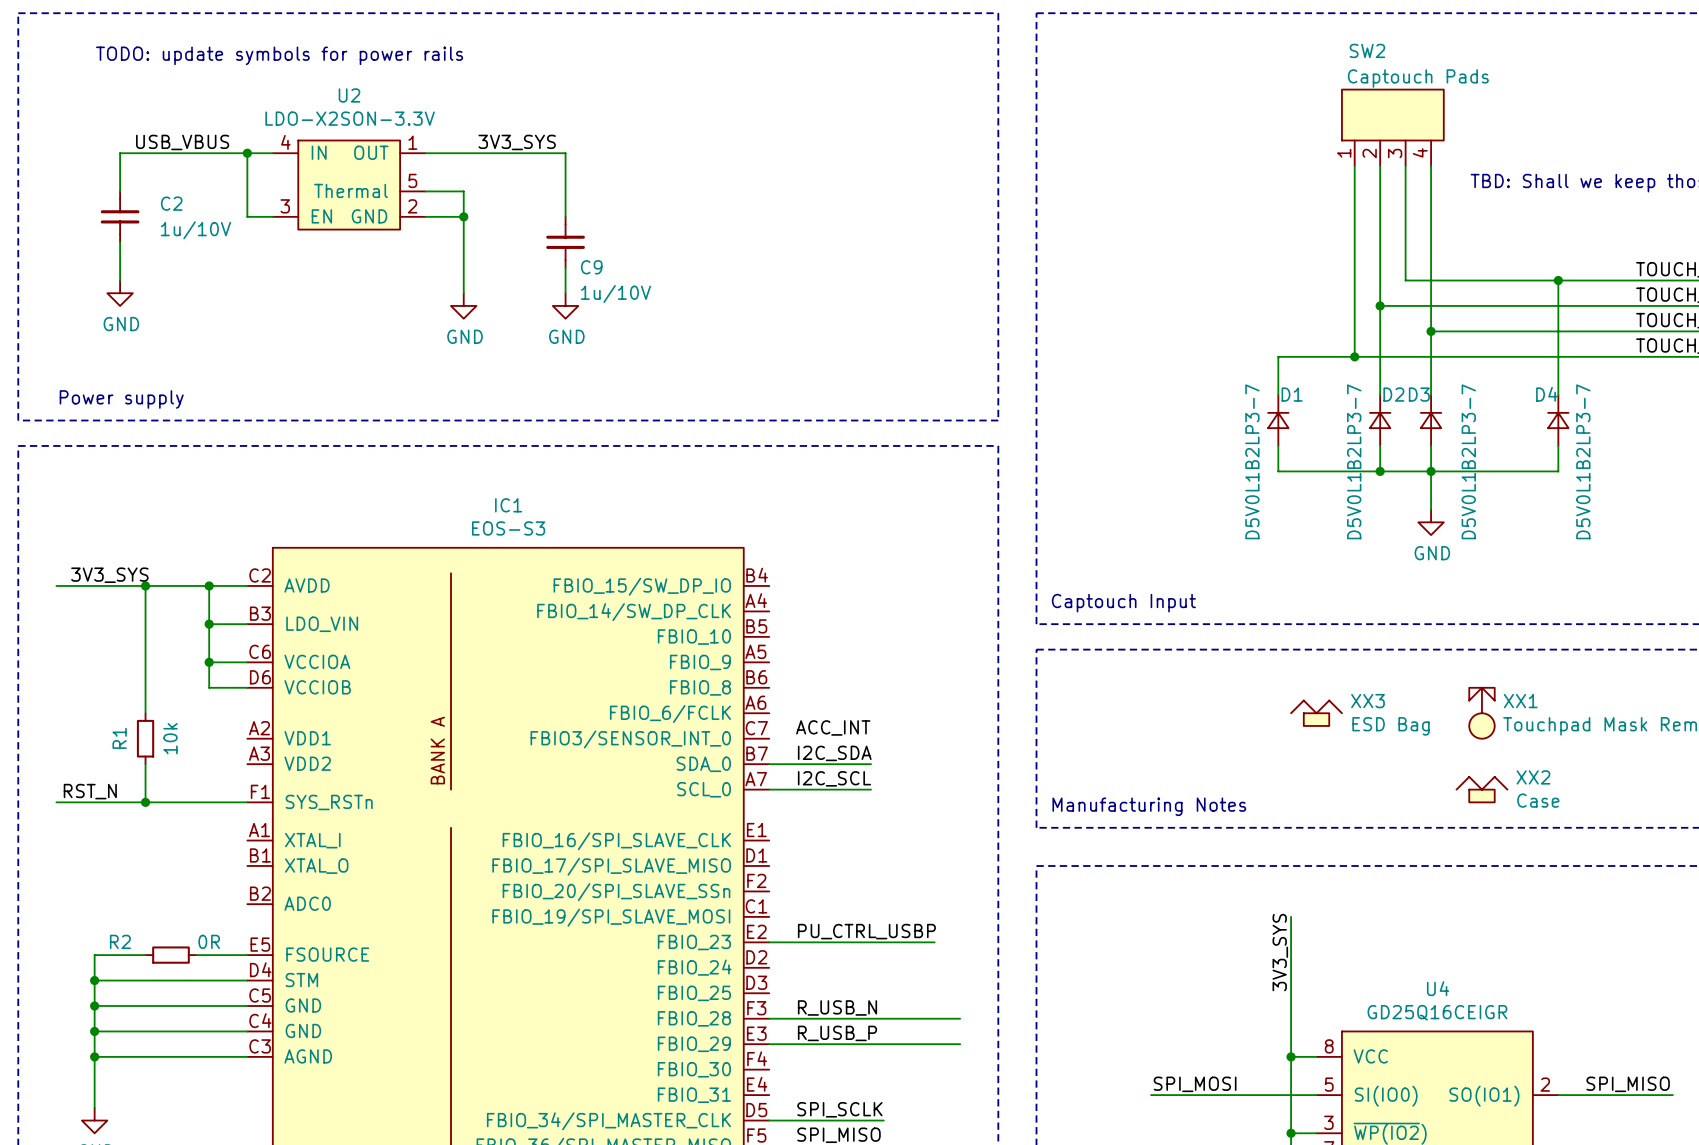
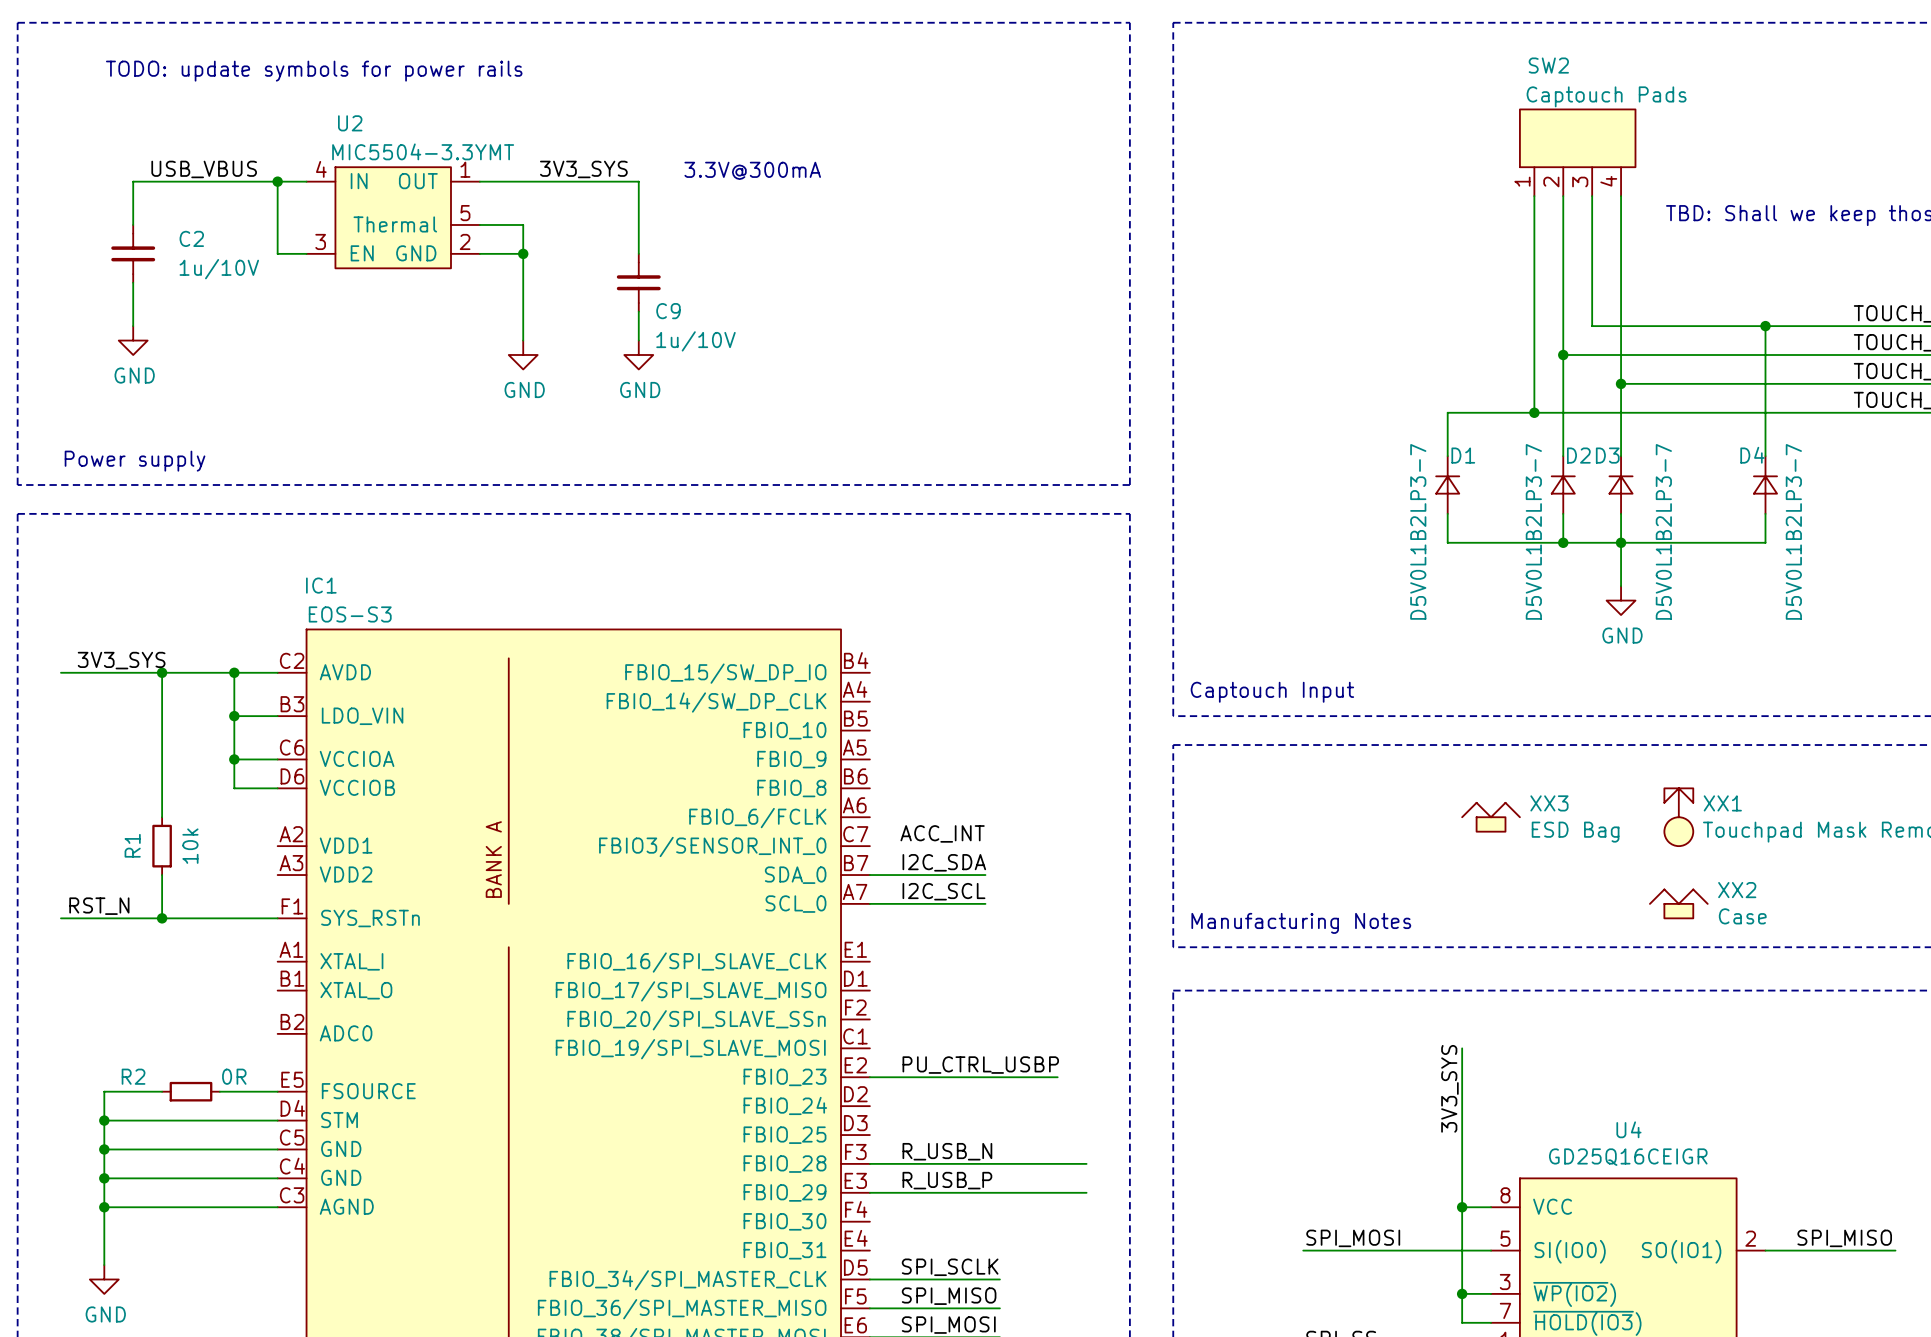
U2 name position: U2 (349, 95) -> U2 (350, 123)
U2 value: LDO-X2SON-3.3V (350, 118) -> MIC5504-3.3YMT (423, 151)
text: none -> 3.3V@300mA (752, 170)
IC1 name position: IC1 (508, 505) -> IC1 (321, 585)
IC1 value position: EOS-S3 (508, 528) -> EOS-S3 (350, 614)

